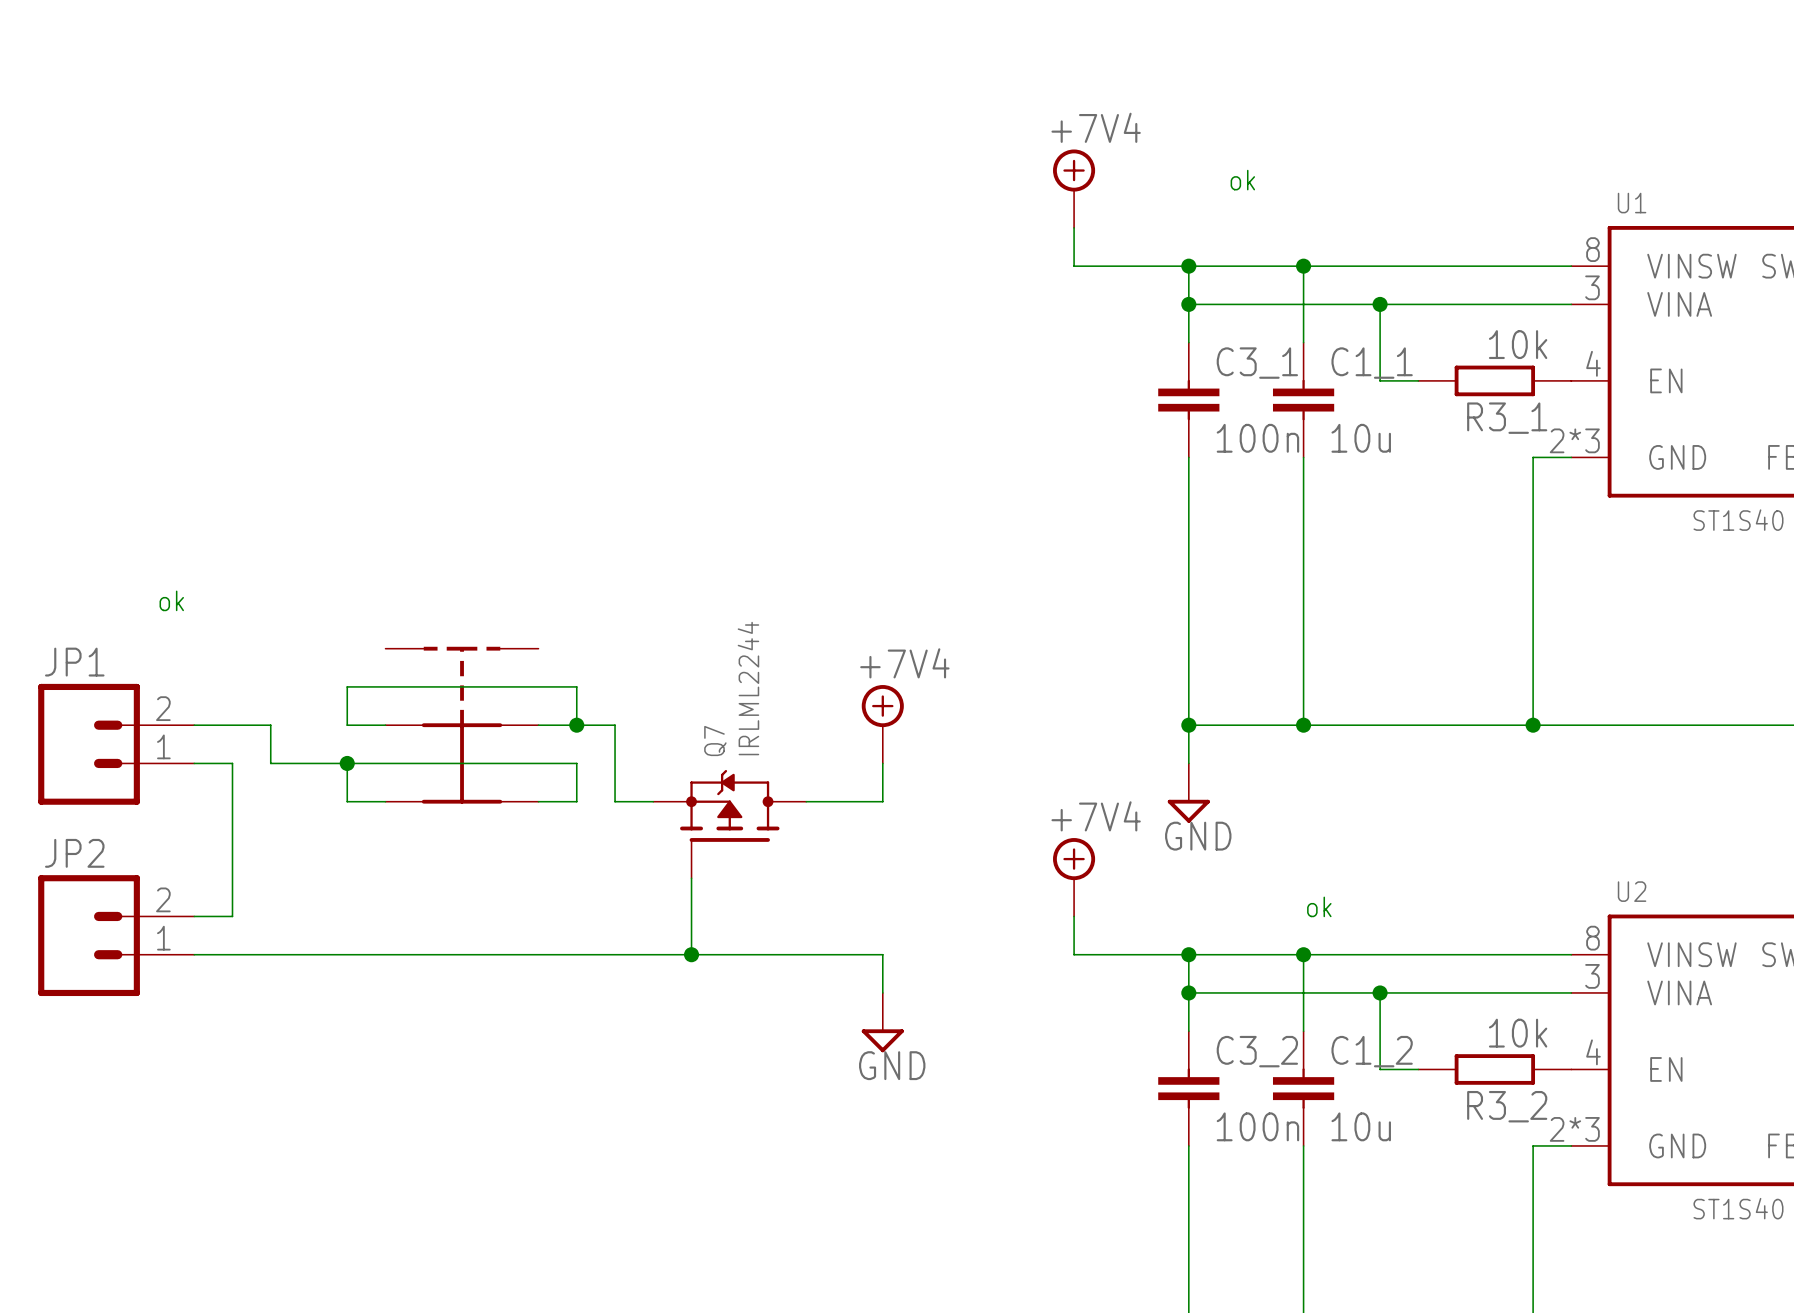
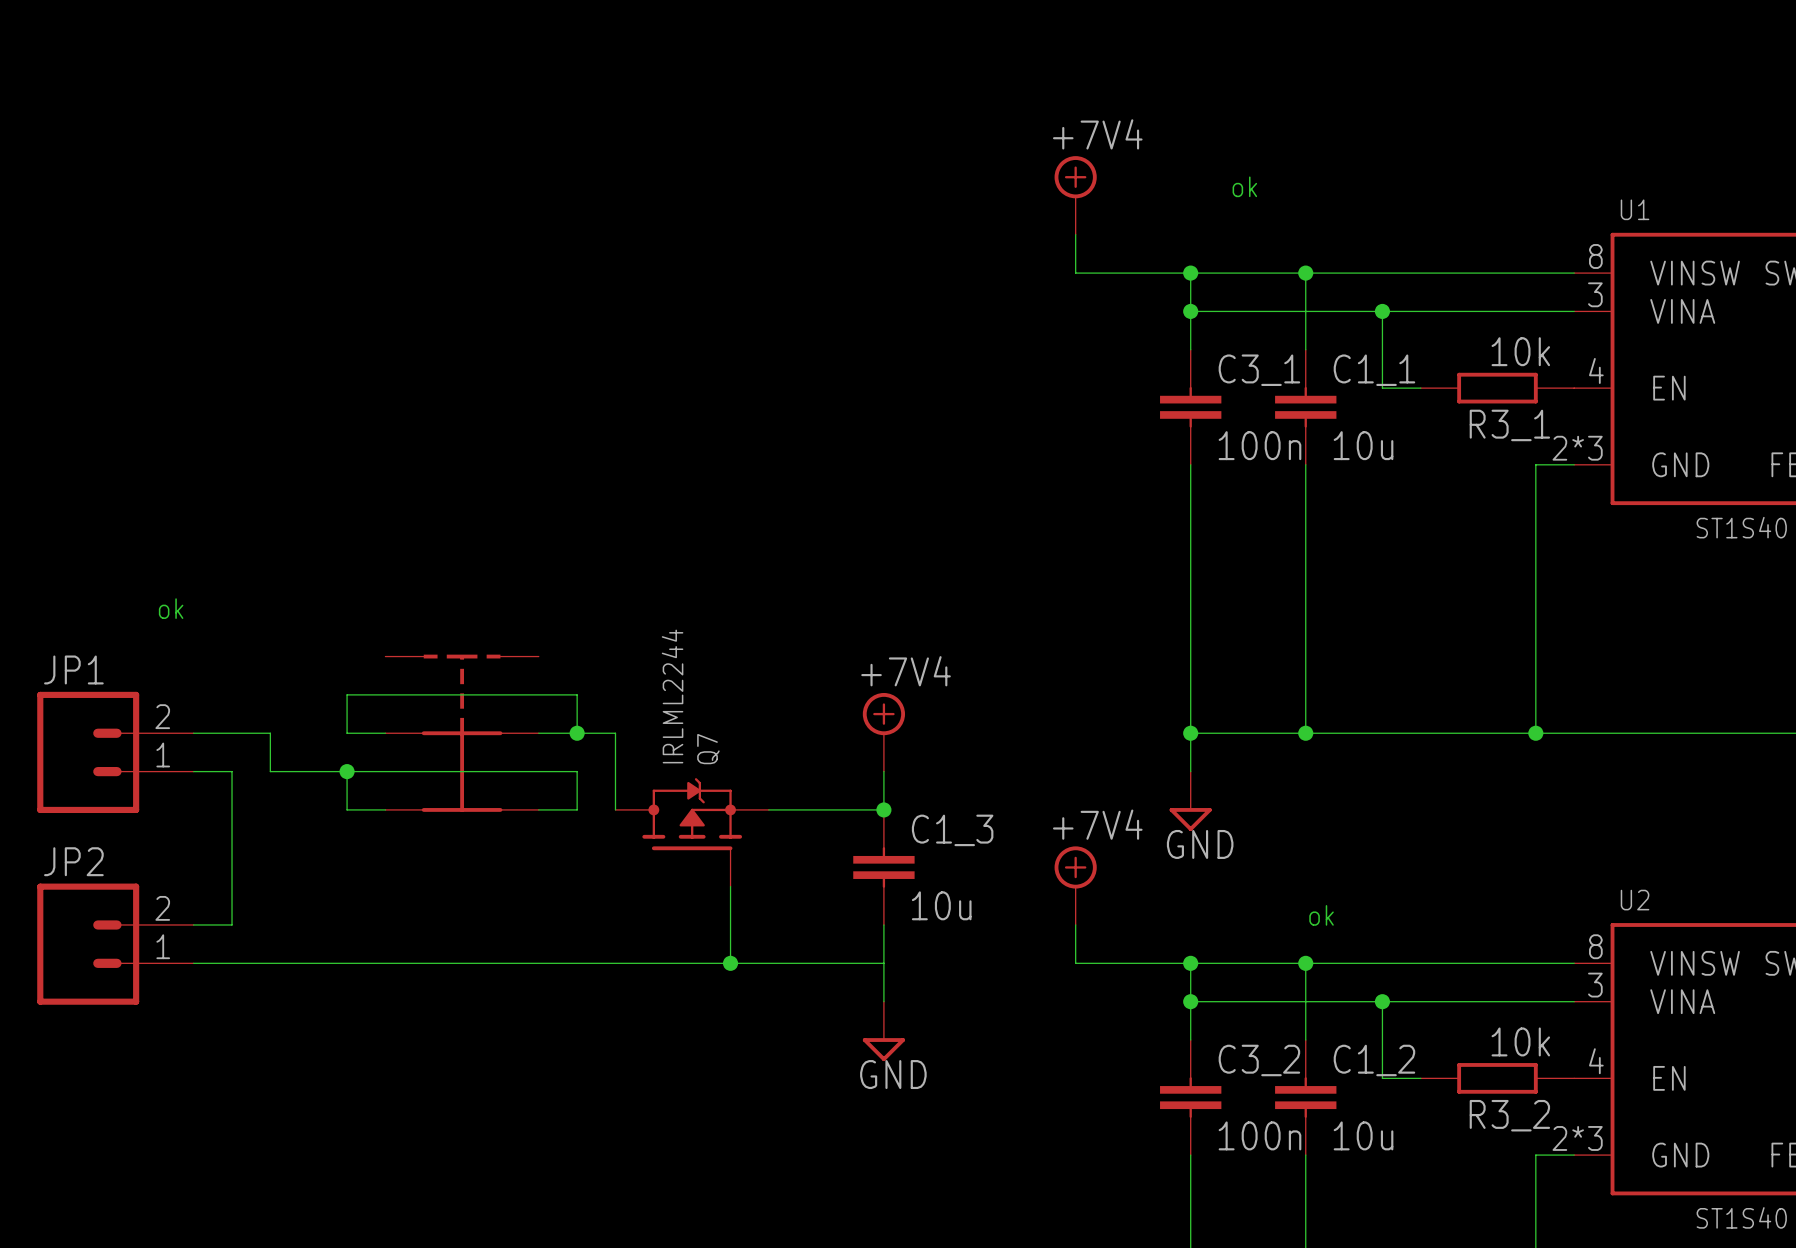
junction: none -> (883, 809)
Q7 flip: as is (729, 805) -> left-right (692, 814)
C1_3: none -> 10u (883, 867)
wire: (691, 878) (691, 954) -> (730, 886) (730, 963)
wire: none -> (883, 924) (883, 963)
junction position: (691, 954) -> (730, 963)

